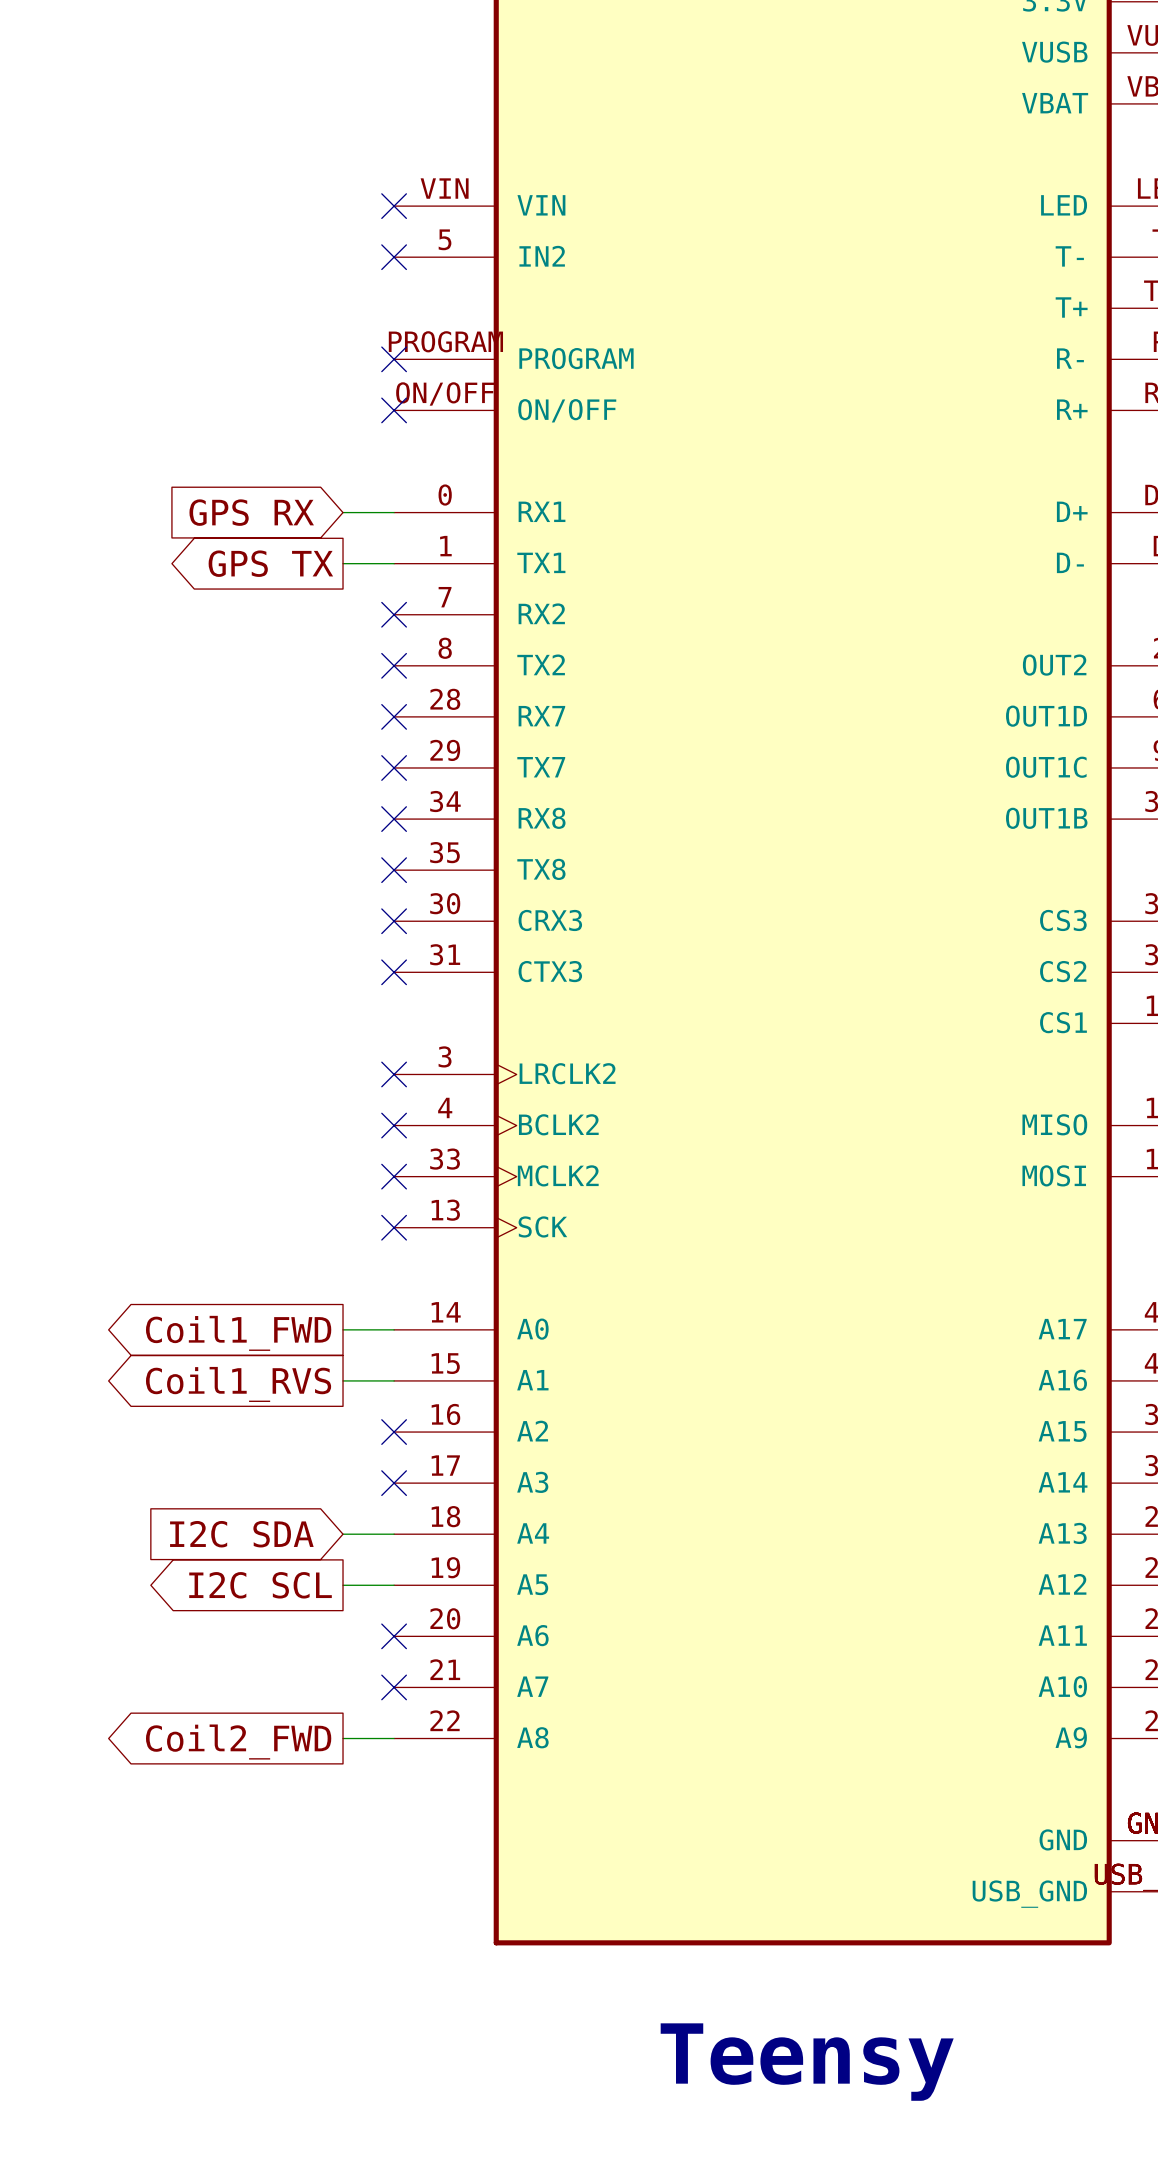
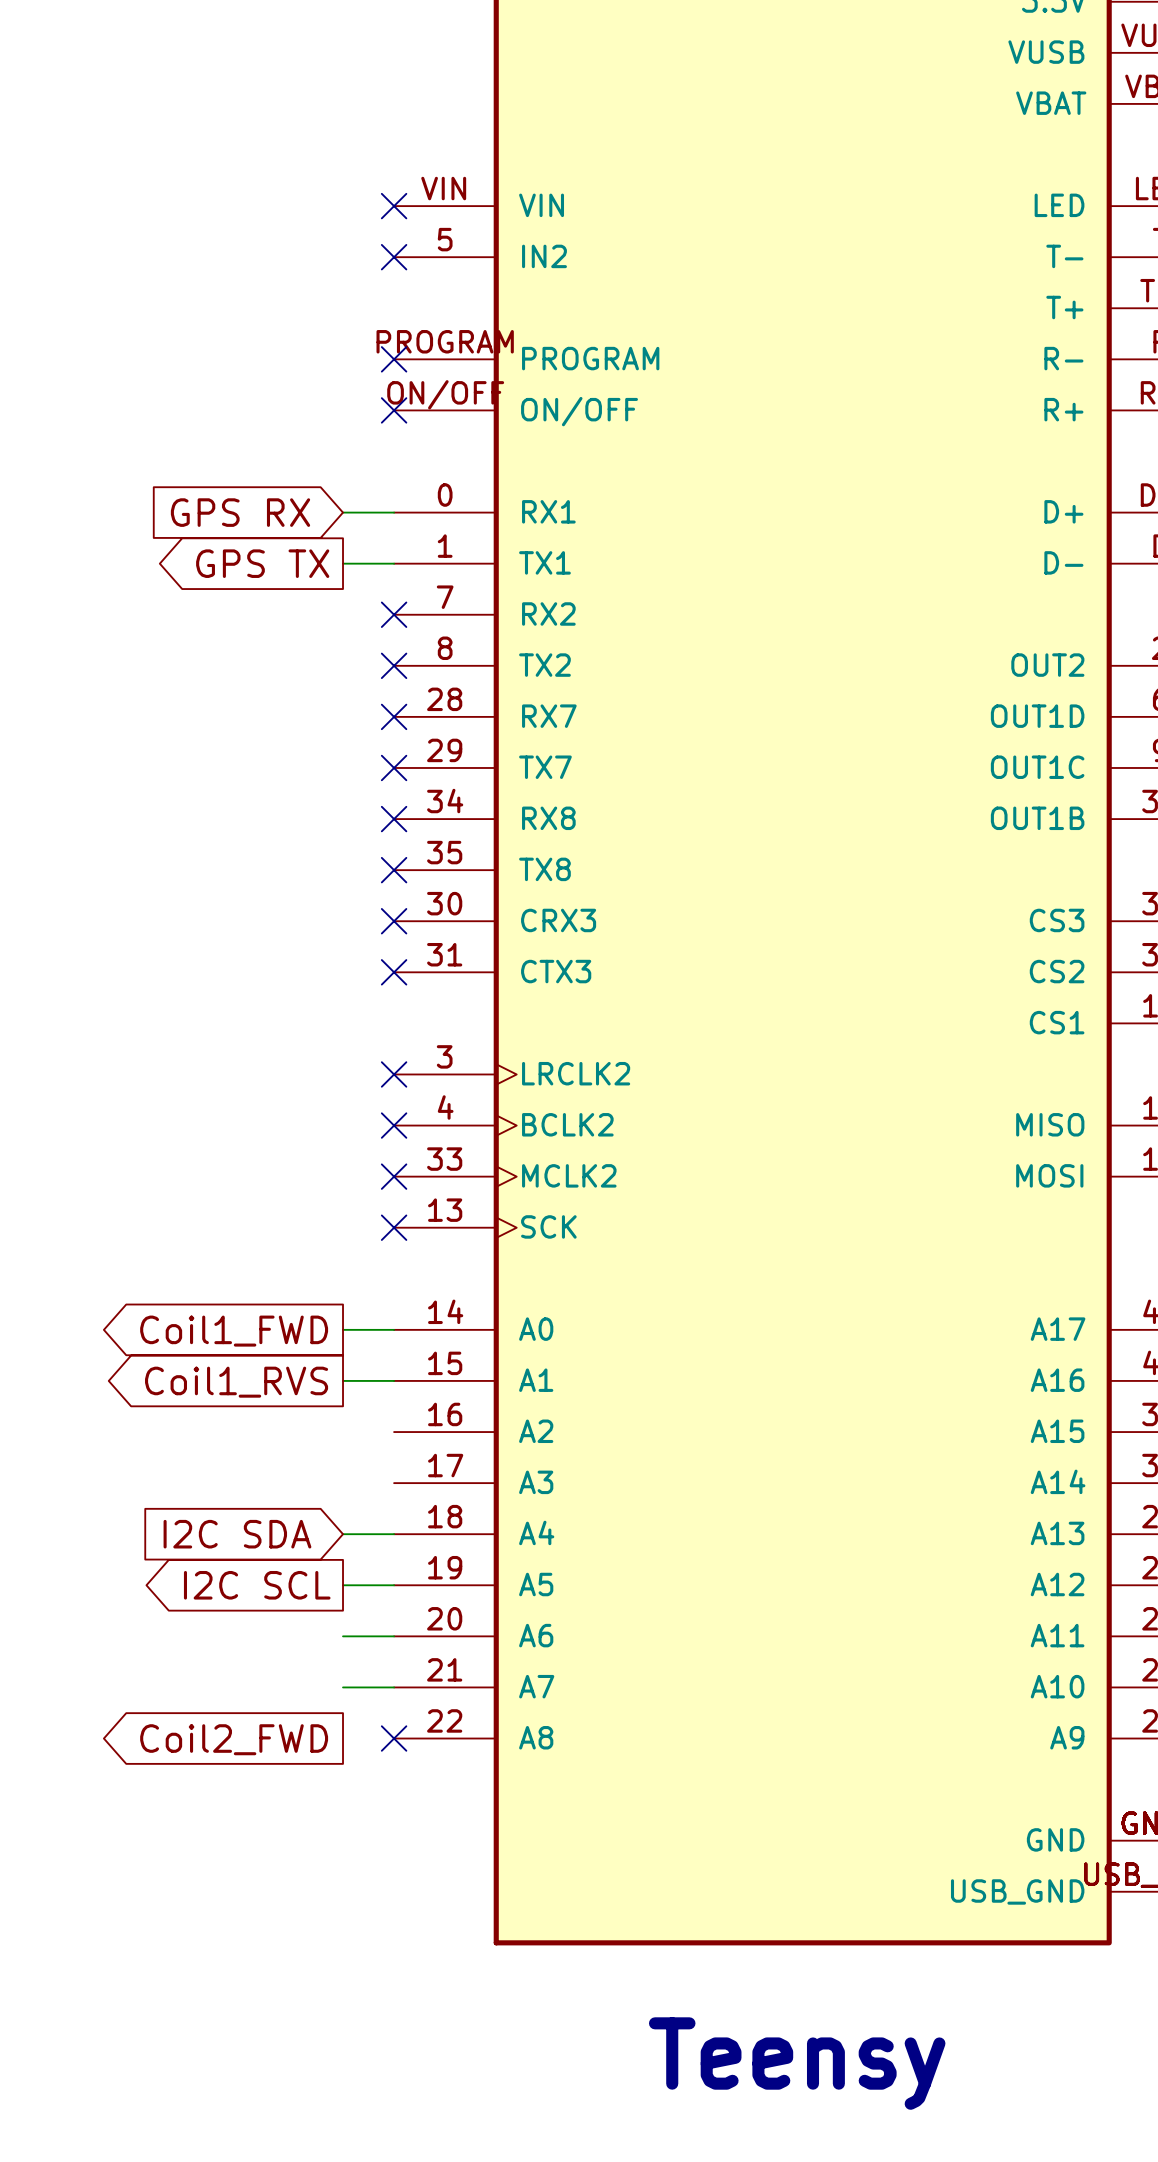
no-connect mark: (394, 1432) -> none
no-connect mark: (394, 1483) -> none
wire: none -> (343, 1636) (394, 1636)
no-connect mark: (394, 1636) -> none
no-connect mark: (394, 1687) -> none
wire: (343, 1738) (394, 1738) -> (343, 1687) (394, 1687)
no-connect mark: none -> (394, 1738)

